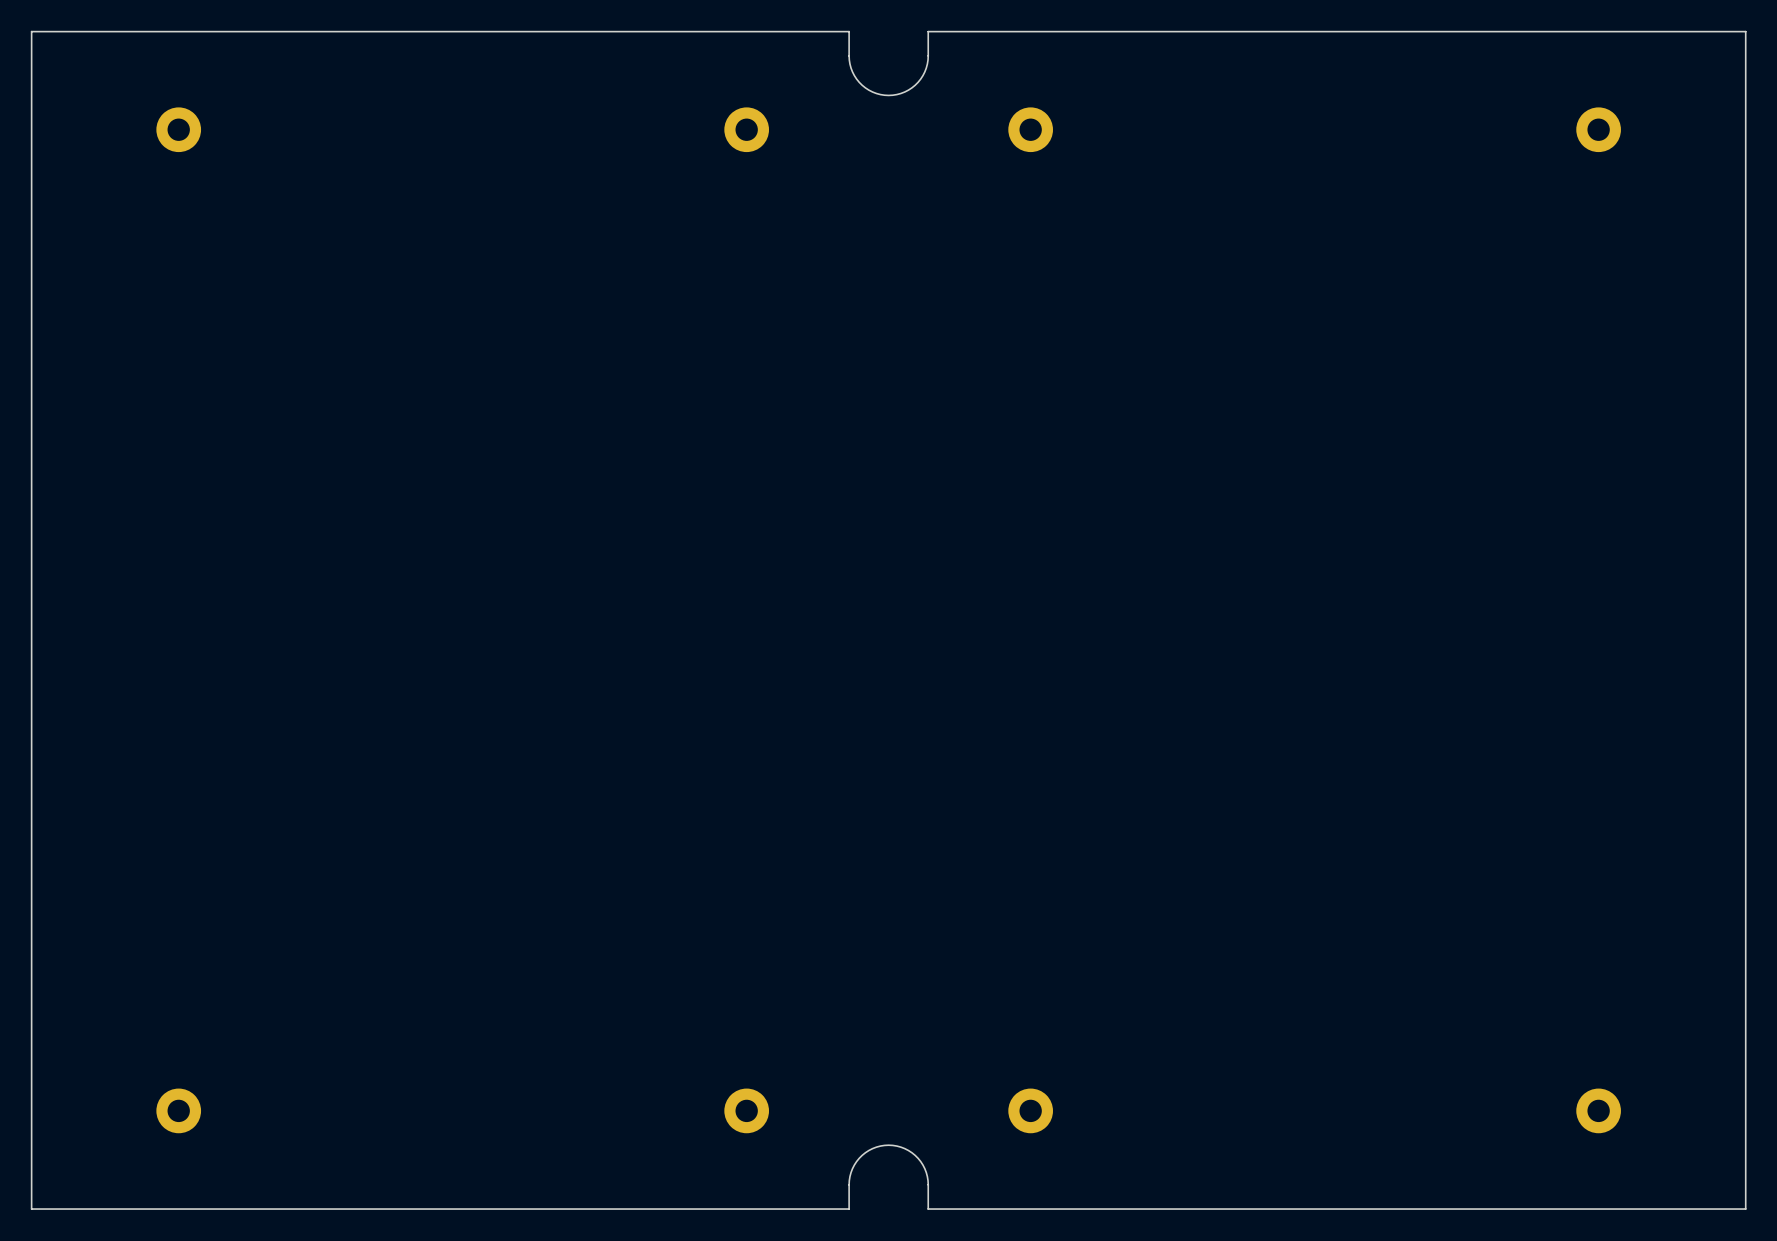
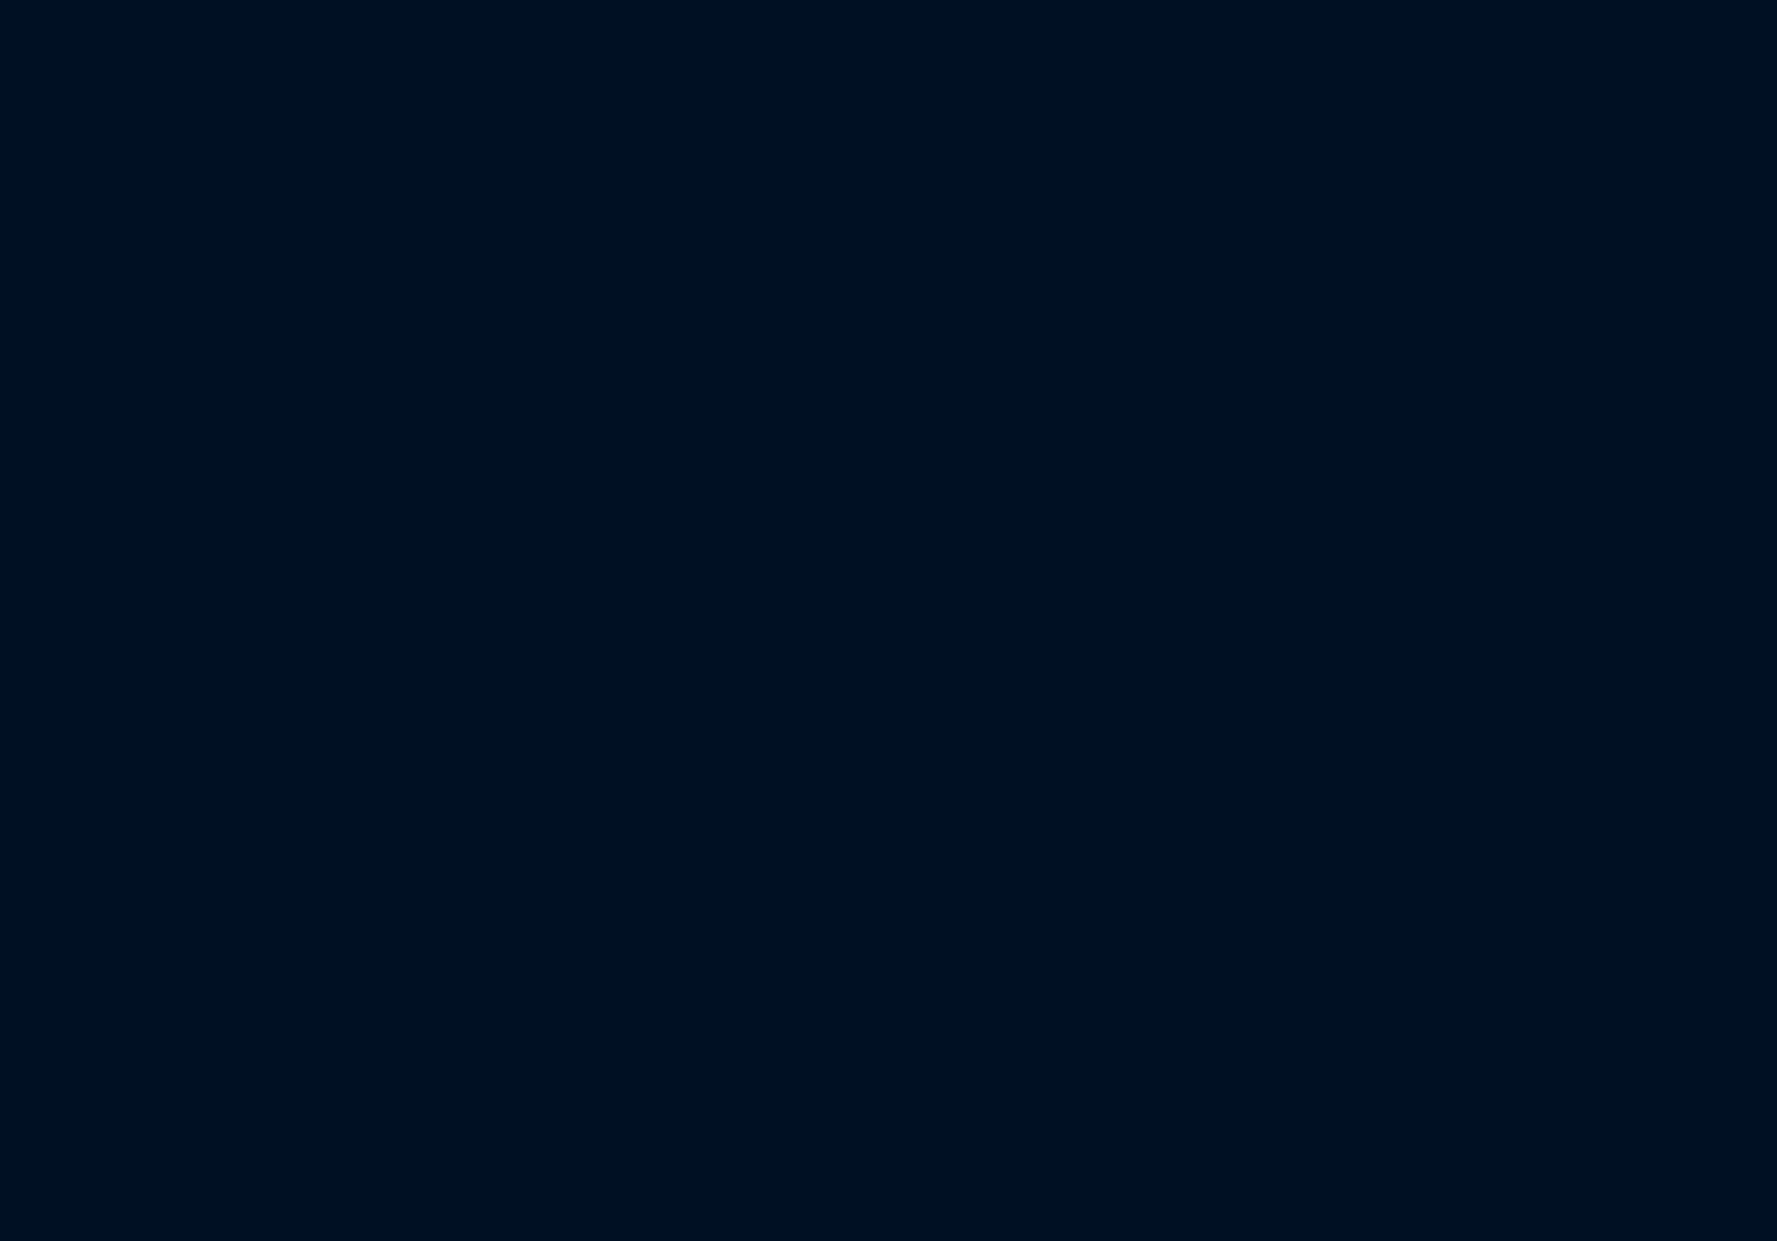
board edge: (31, 31) (849, 31) (849, 60) (854, 75) (868, 90) (888, 95) (908, 90) (922, 75) (928, 60) (928, 31) (1745, 31) (1745, 1209) (928, 1209) (928, 1180) (922, 1164) (908, 1150) (888, 1145) (868, 1150) (854, 1164) (849, 1180) (849, 1209) (31, 1209) (31, 31) -> none
part: (178, 129) -> none
part: (746, 129) -> none
part: (1030, 129) -> none
part: (1598, 129) -> none
part: (178, 1110) -> none
part: (746, 1110) -> none
part: (1030, 1110) -> none
part: (1598, 1110) -> none

